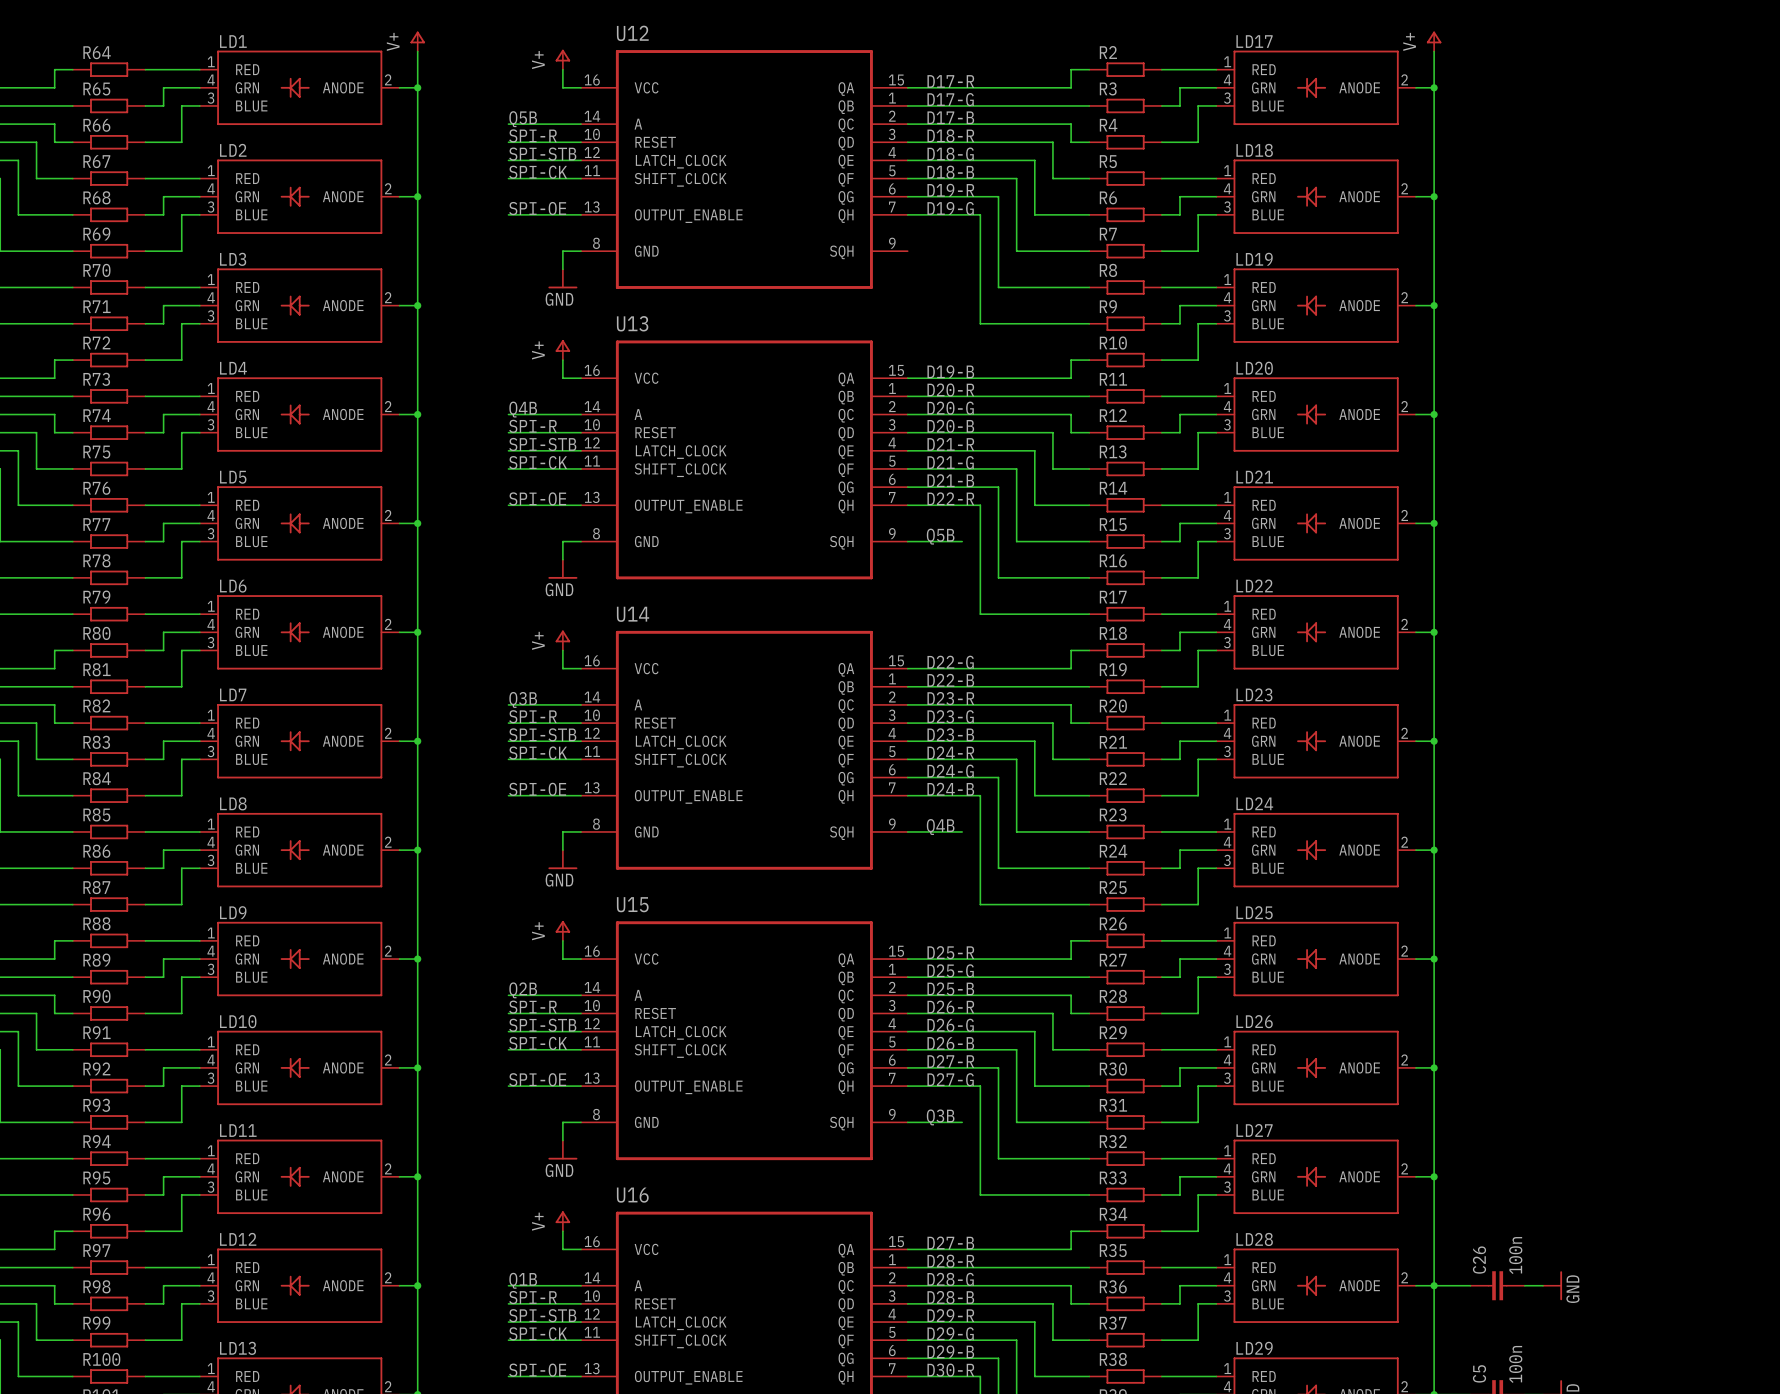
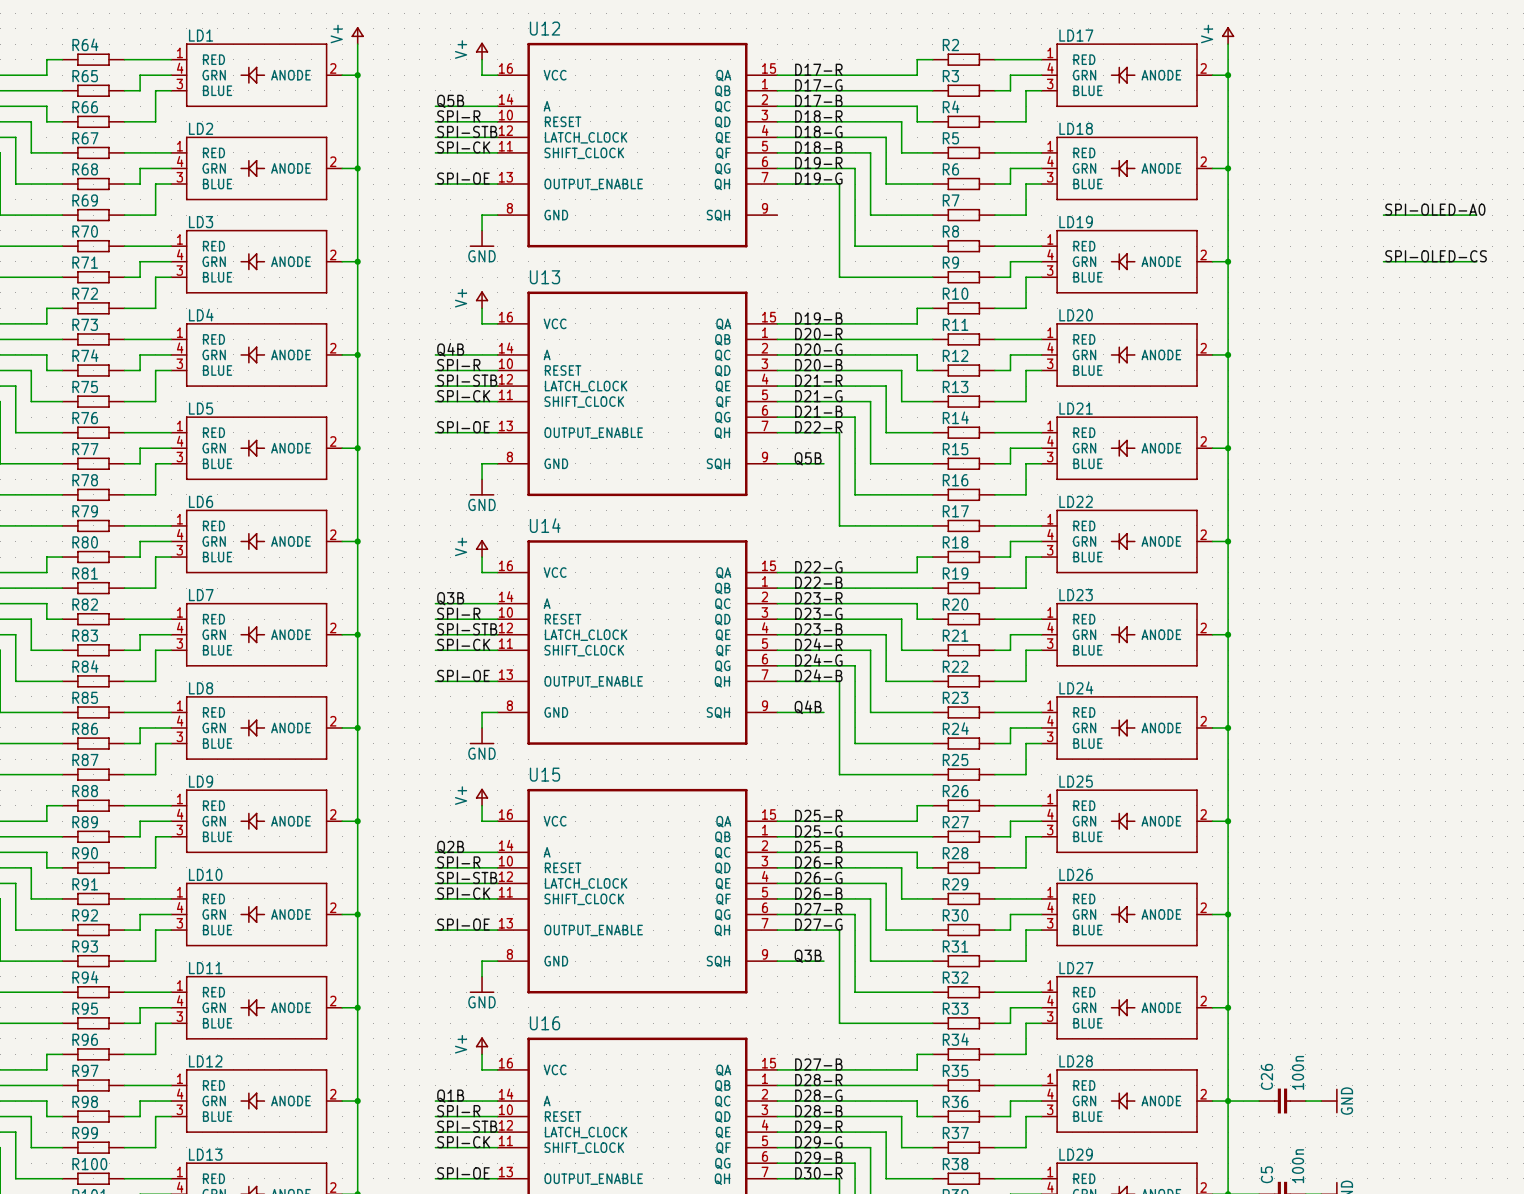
label: none -> SPI-OLED-A0 (1435, 209)
wire: none -> (1383, 215) (1476, 215)
label: none -> SPI-OLED-CS (1436, 256)
wire: none -> (1383, 261) (1476, 261)

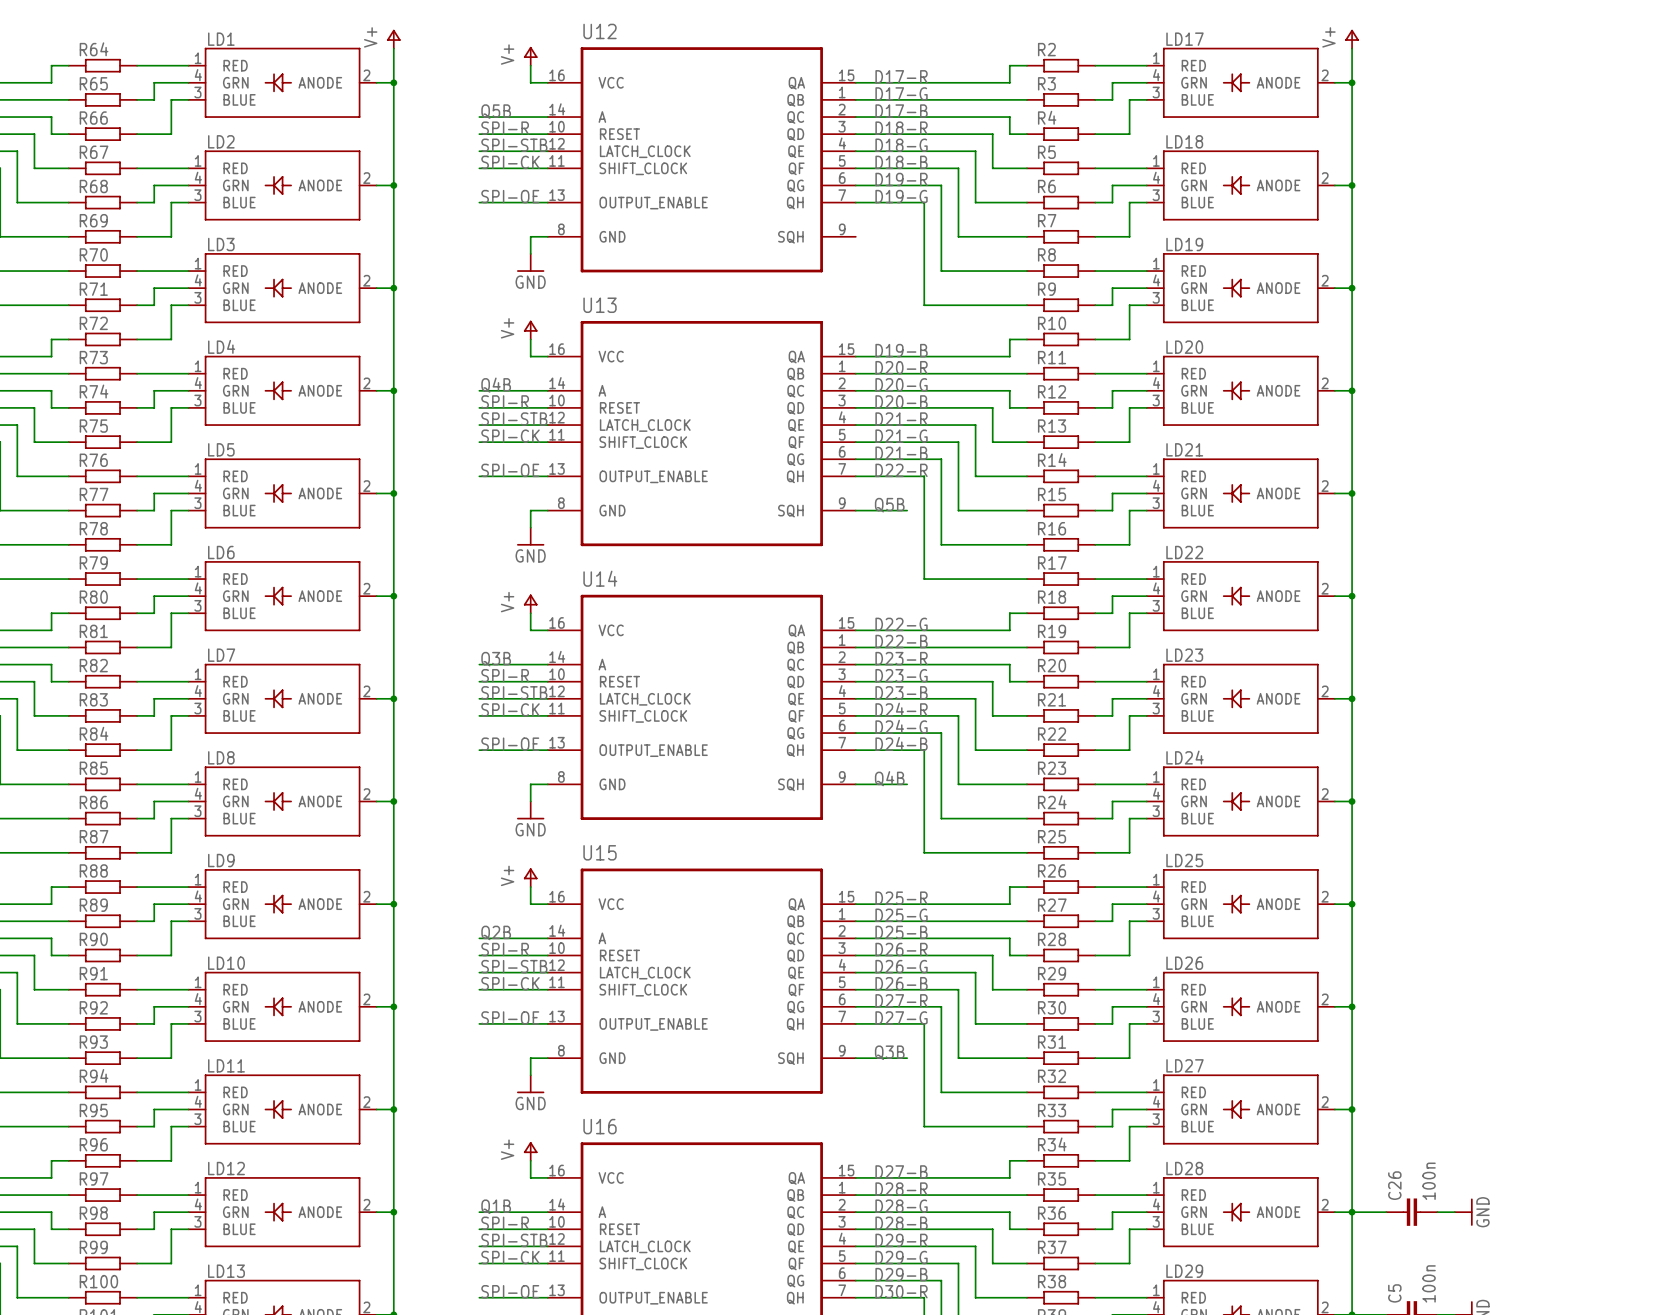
label: SPI-OLED-A0 (1435, 209) -> none
wire: (1383, 215) (1476, 215) -> none
label: SPI-OLED-CS (1436, 256) -> none
wire: (1383, 261) (1476, 261) -> none

